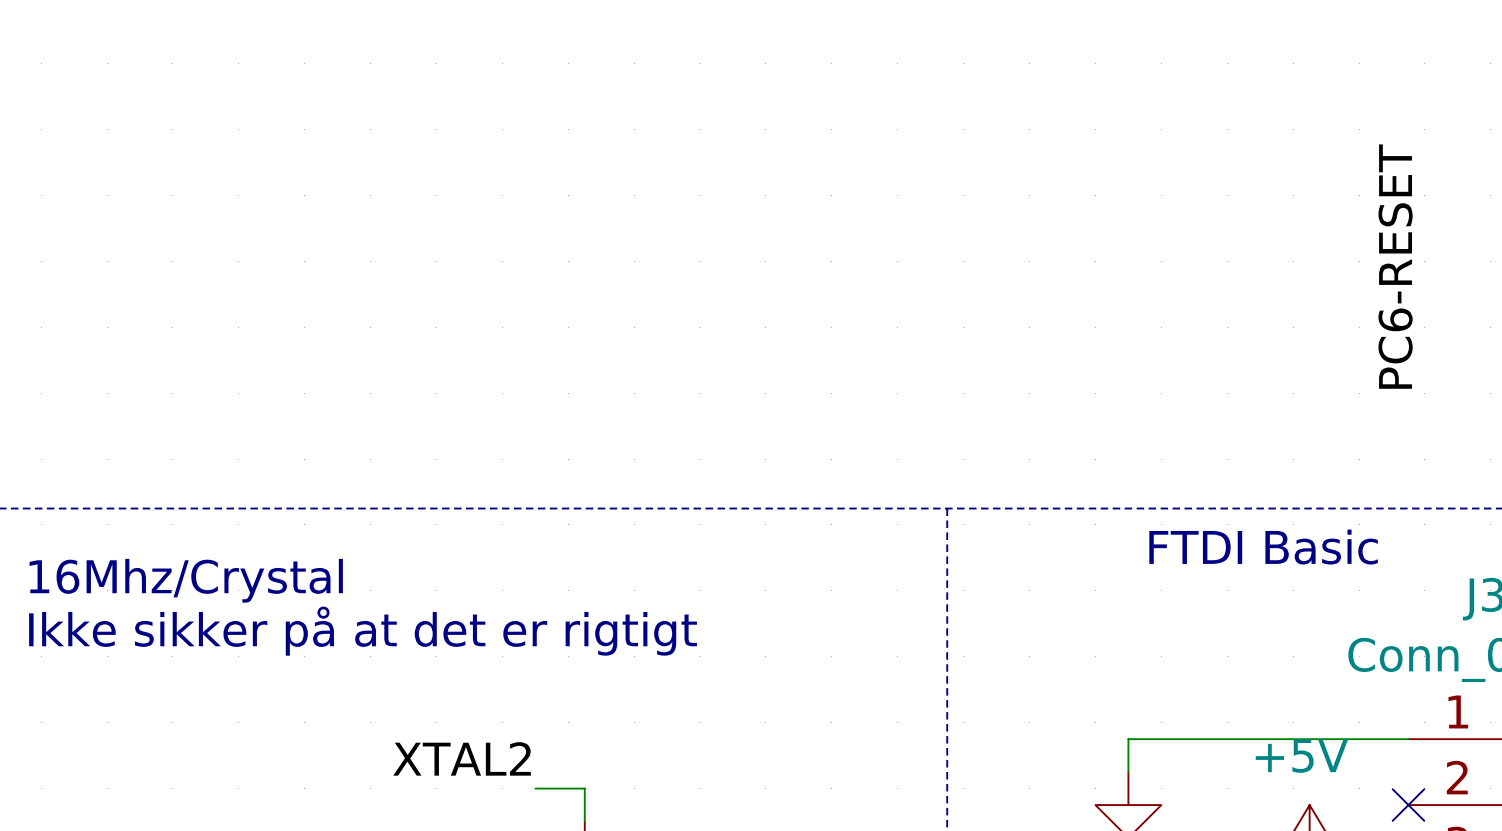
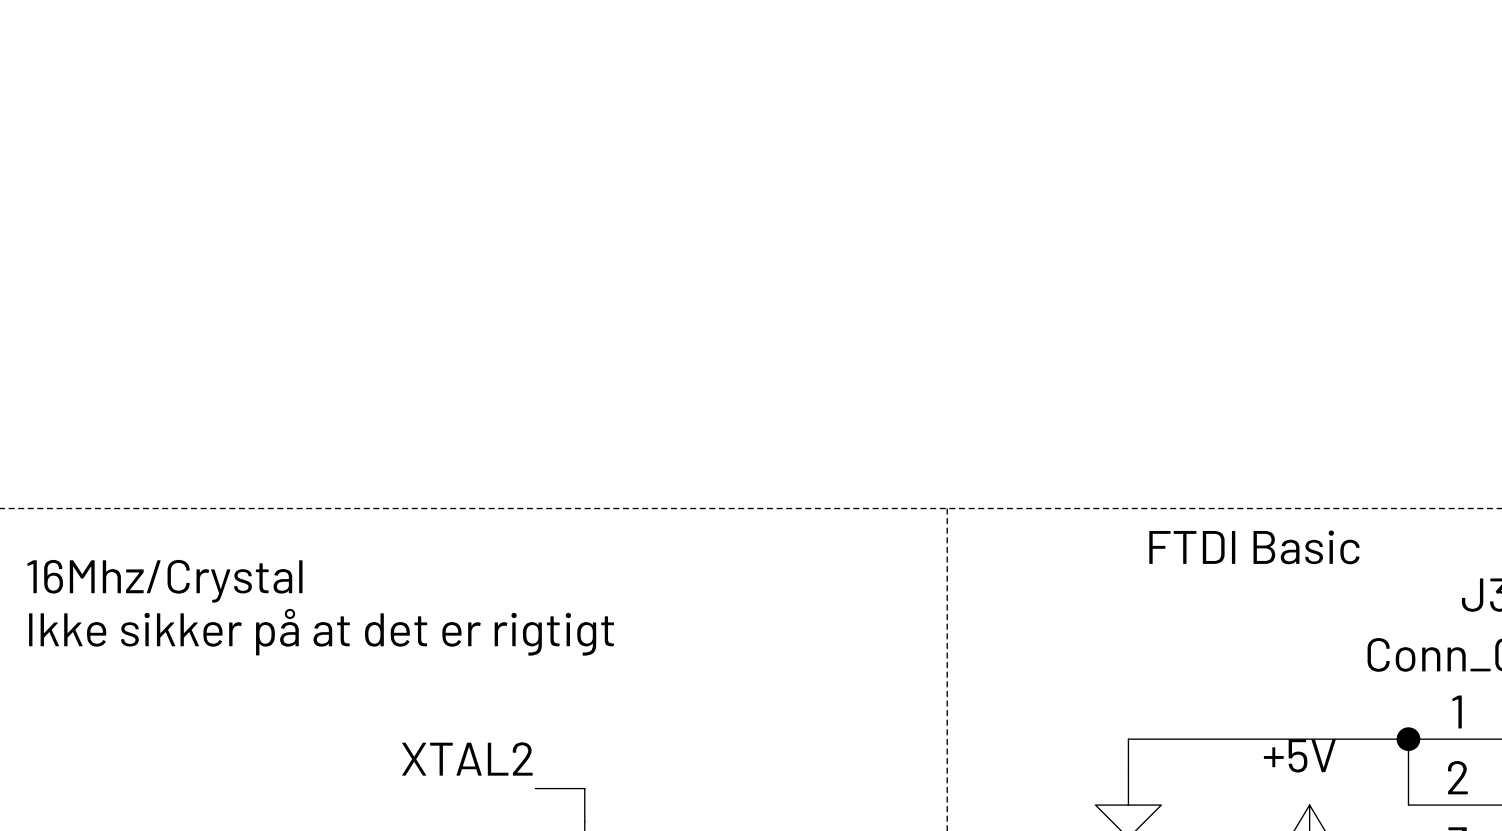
label: PC6-RESET (1395, 266) -> none
wire: none -> (1408, 739) (1408, 805)
junction: none -> (1408, 739)
no-connect mark: (1408, 805) -> none

